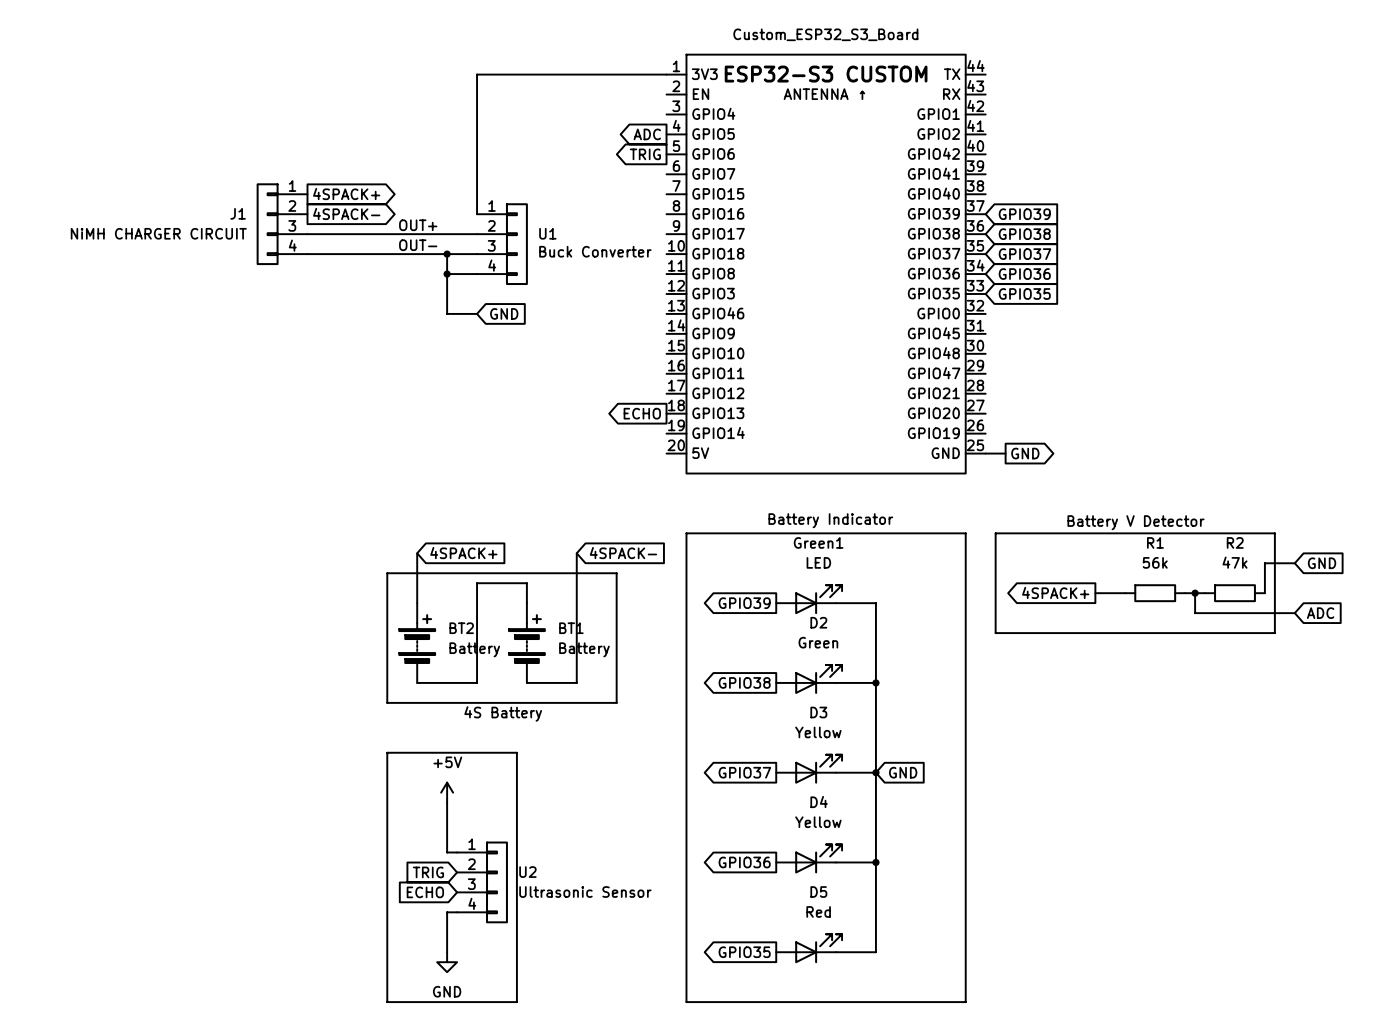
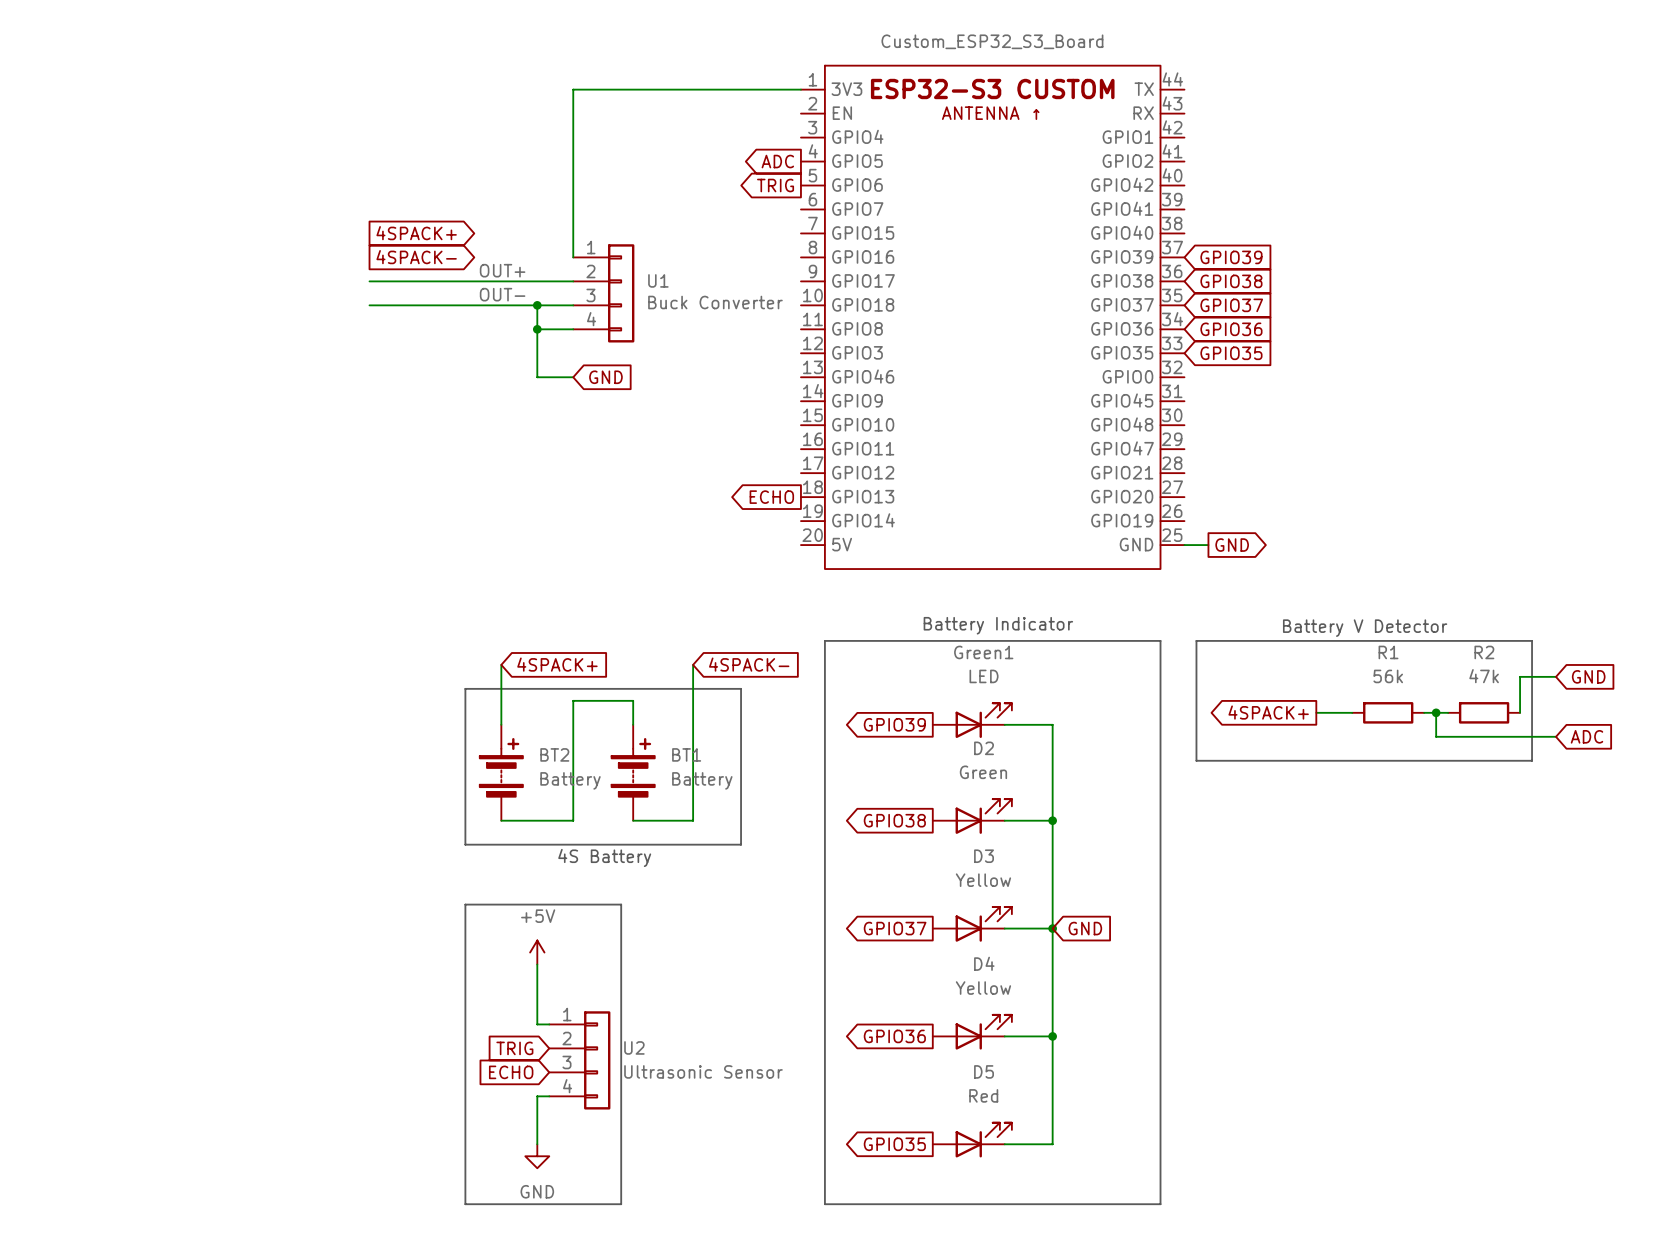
J1: NiMH CHARGER CIRCUIT (282, 224) -> none

